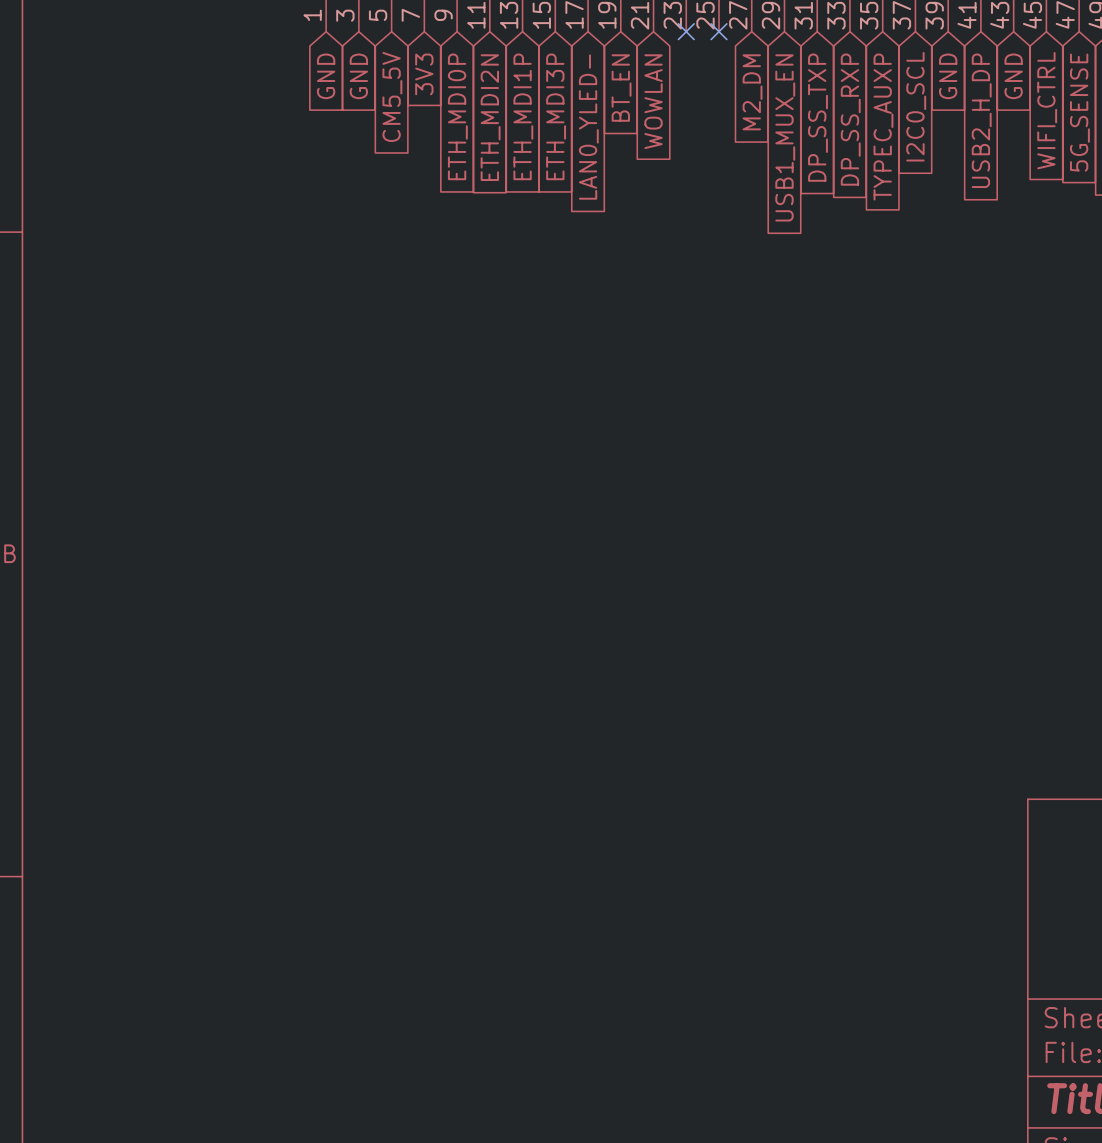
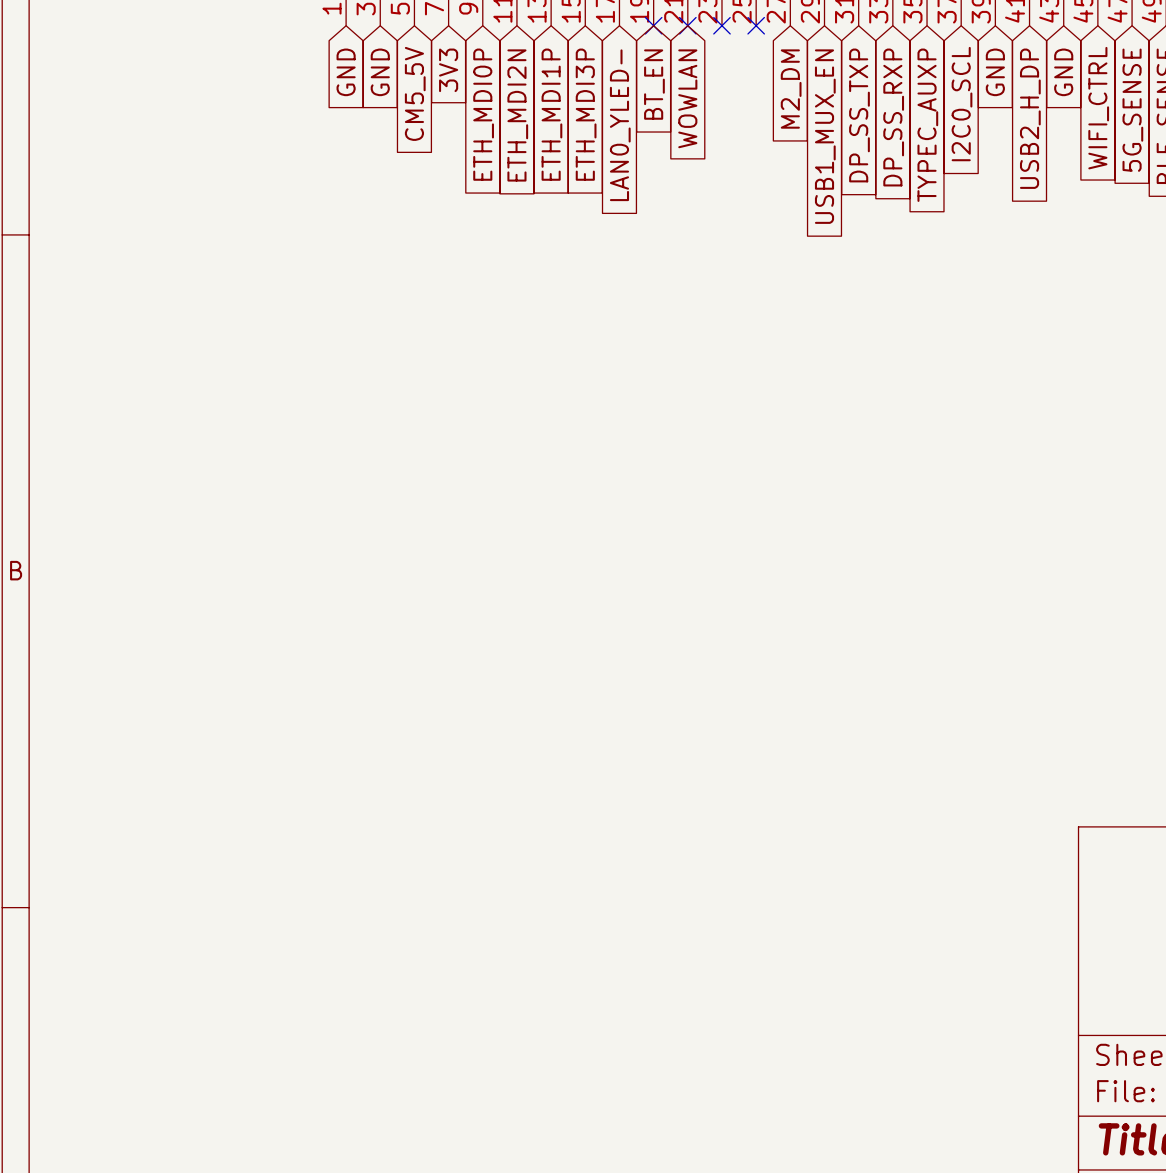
no-connect mark: none -> (653, 25)
no-connect mark: none -> (687, 25)

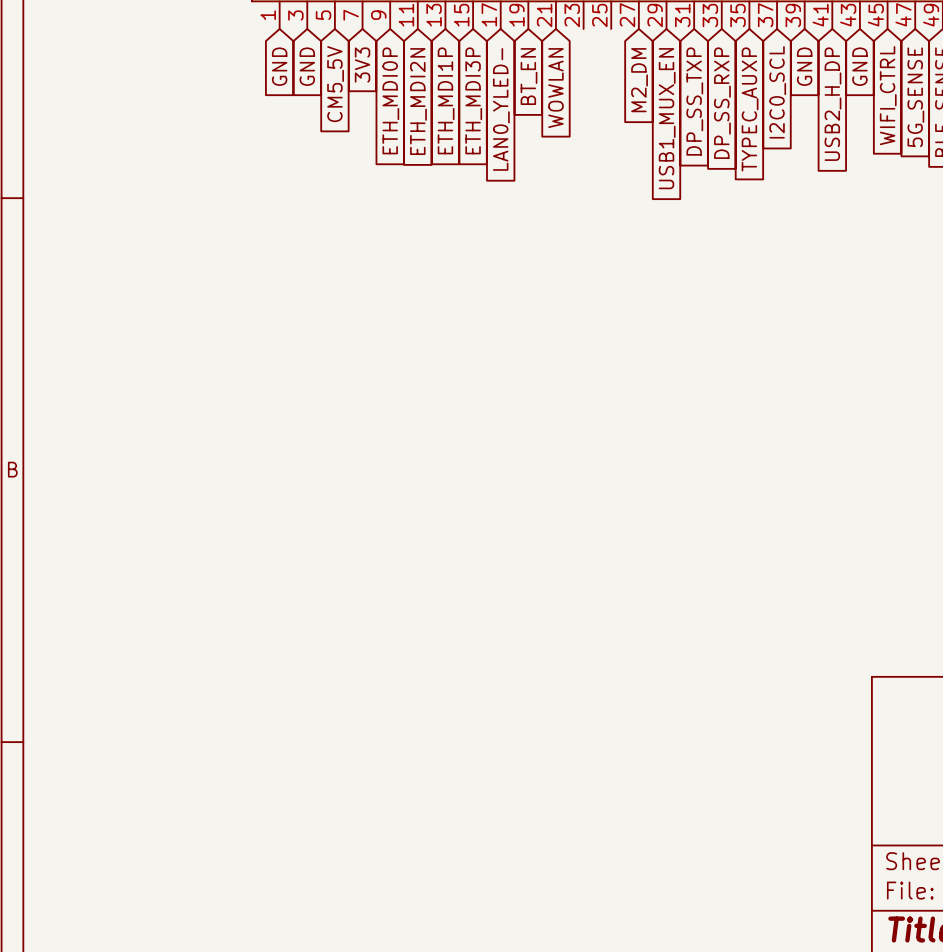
no-connect mark: (653, 25) -> none
no-connect mark: (687, 25) -> none
no-connect mark: (721, 25) -> none
no-connect mark: (756, 25) -> none

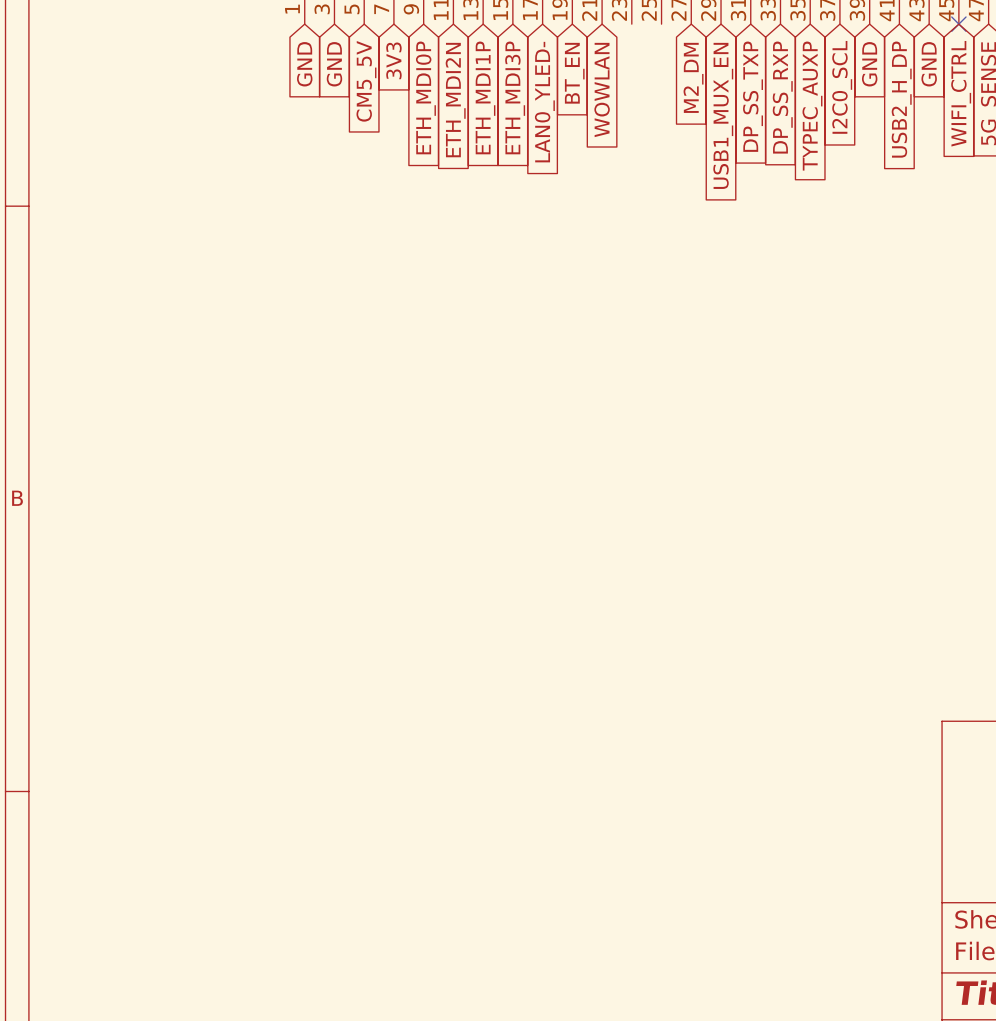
no-connect mark: none -> (958, 24)

